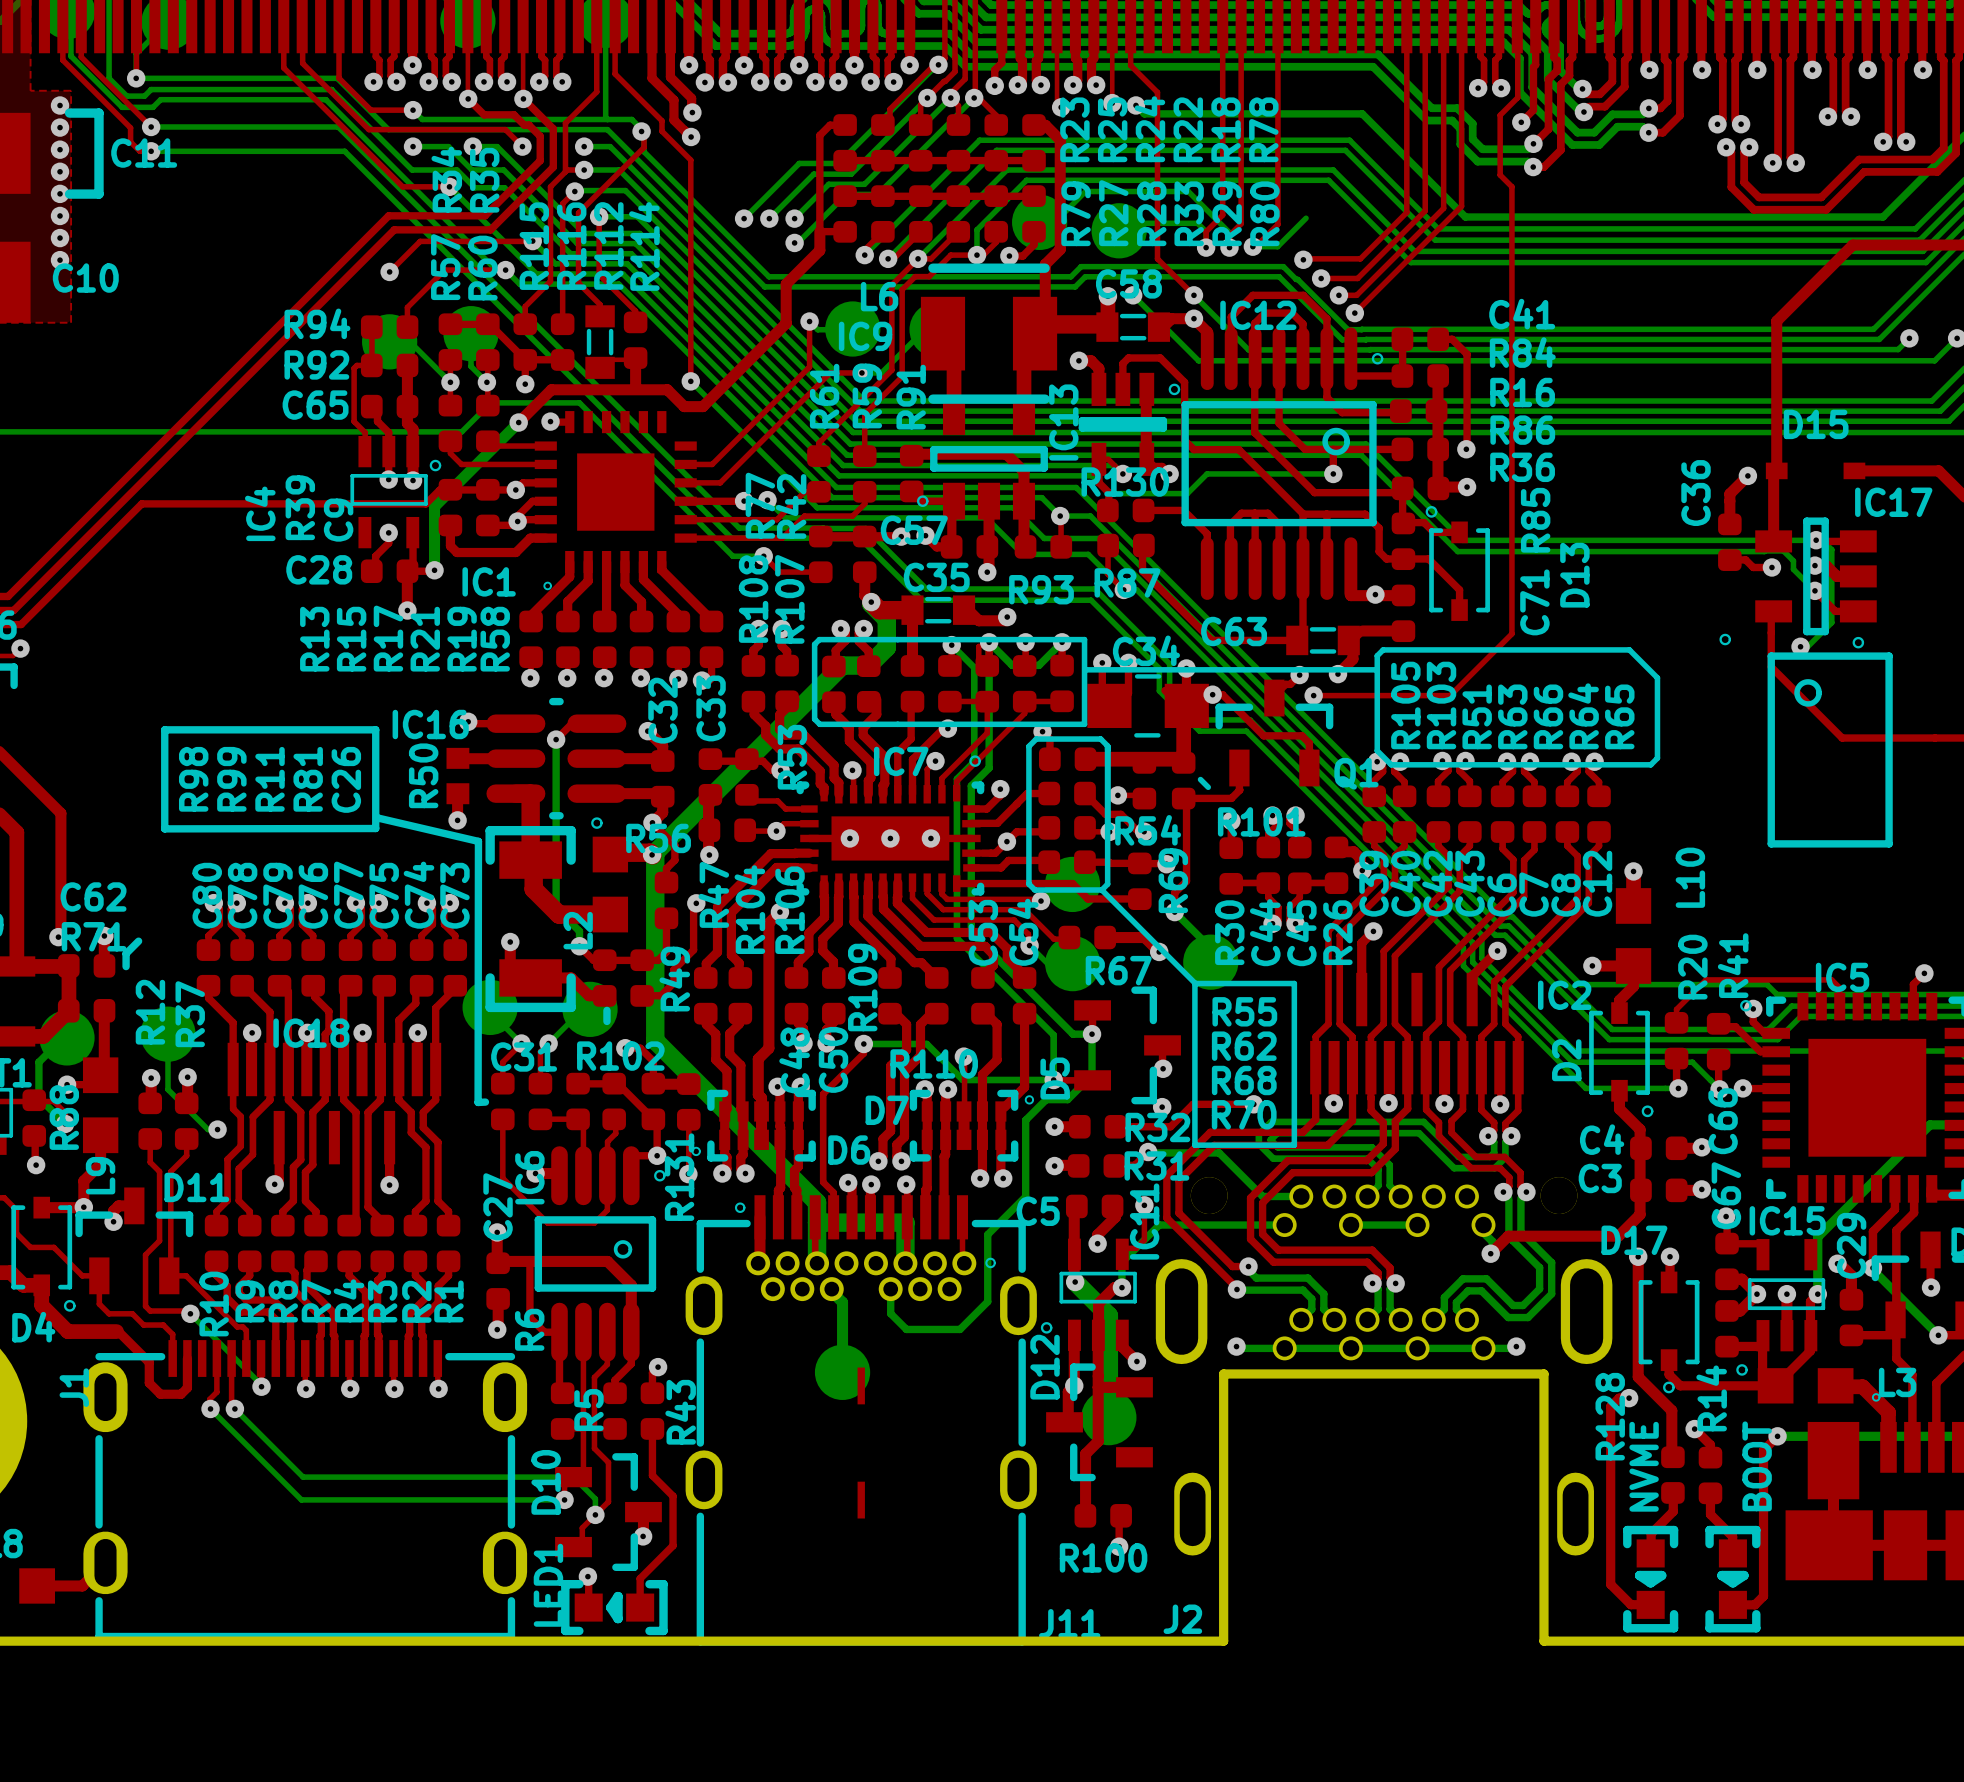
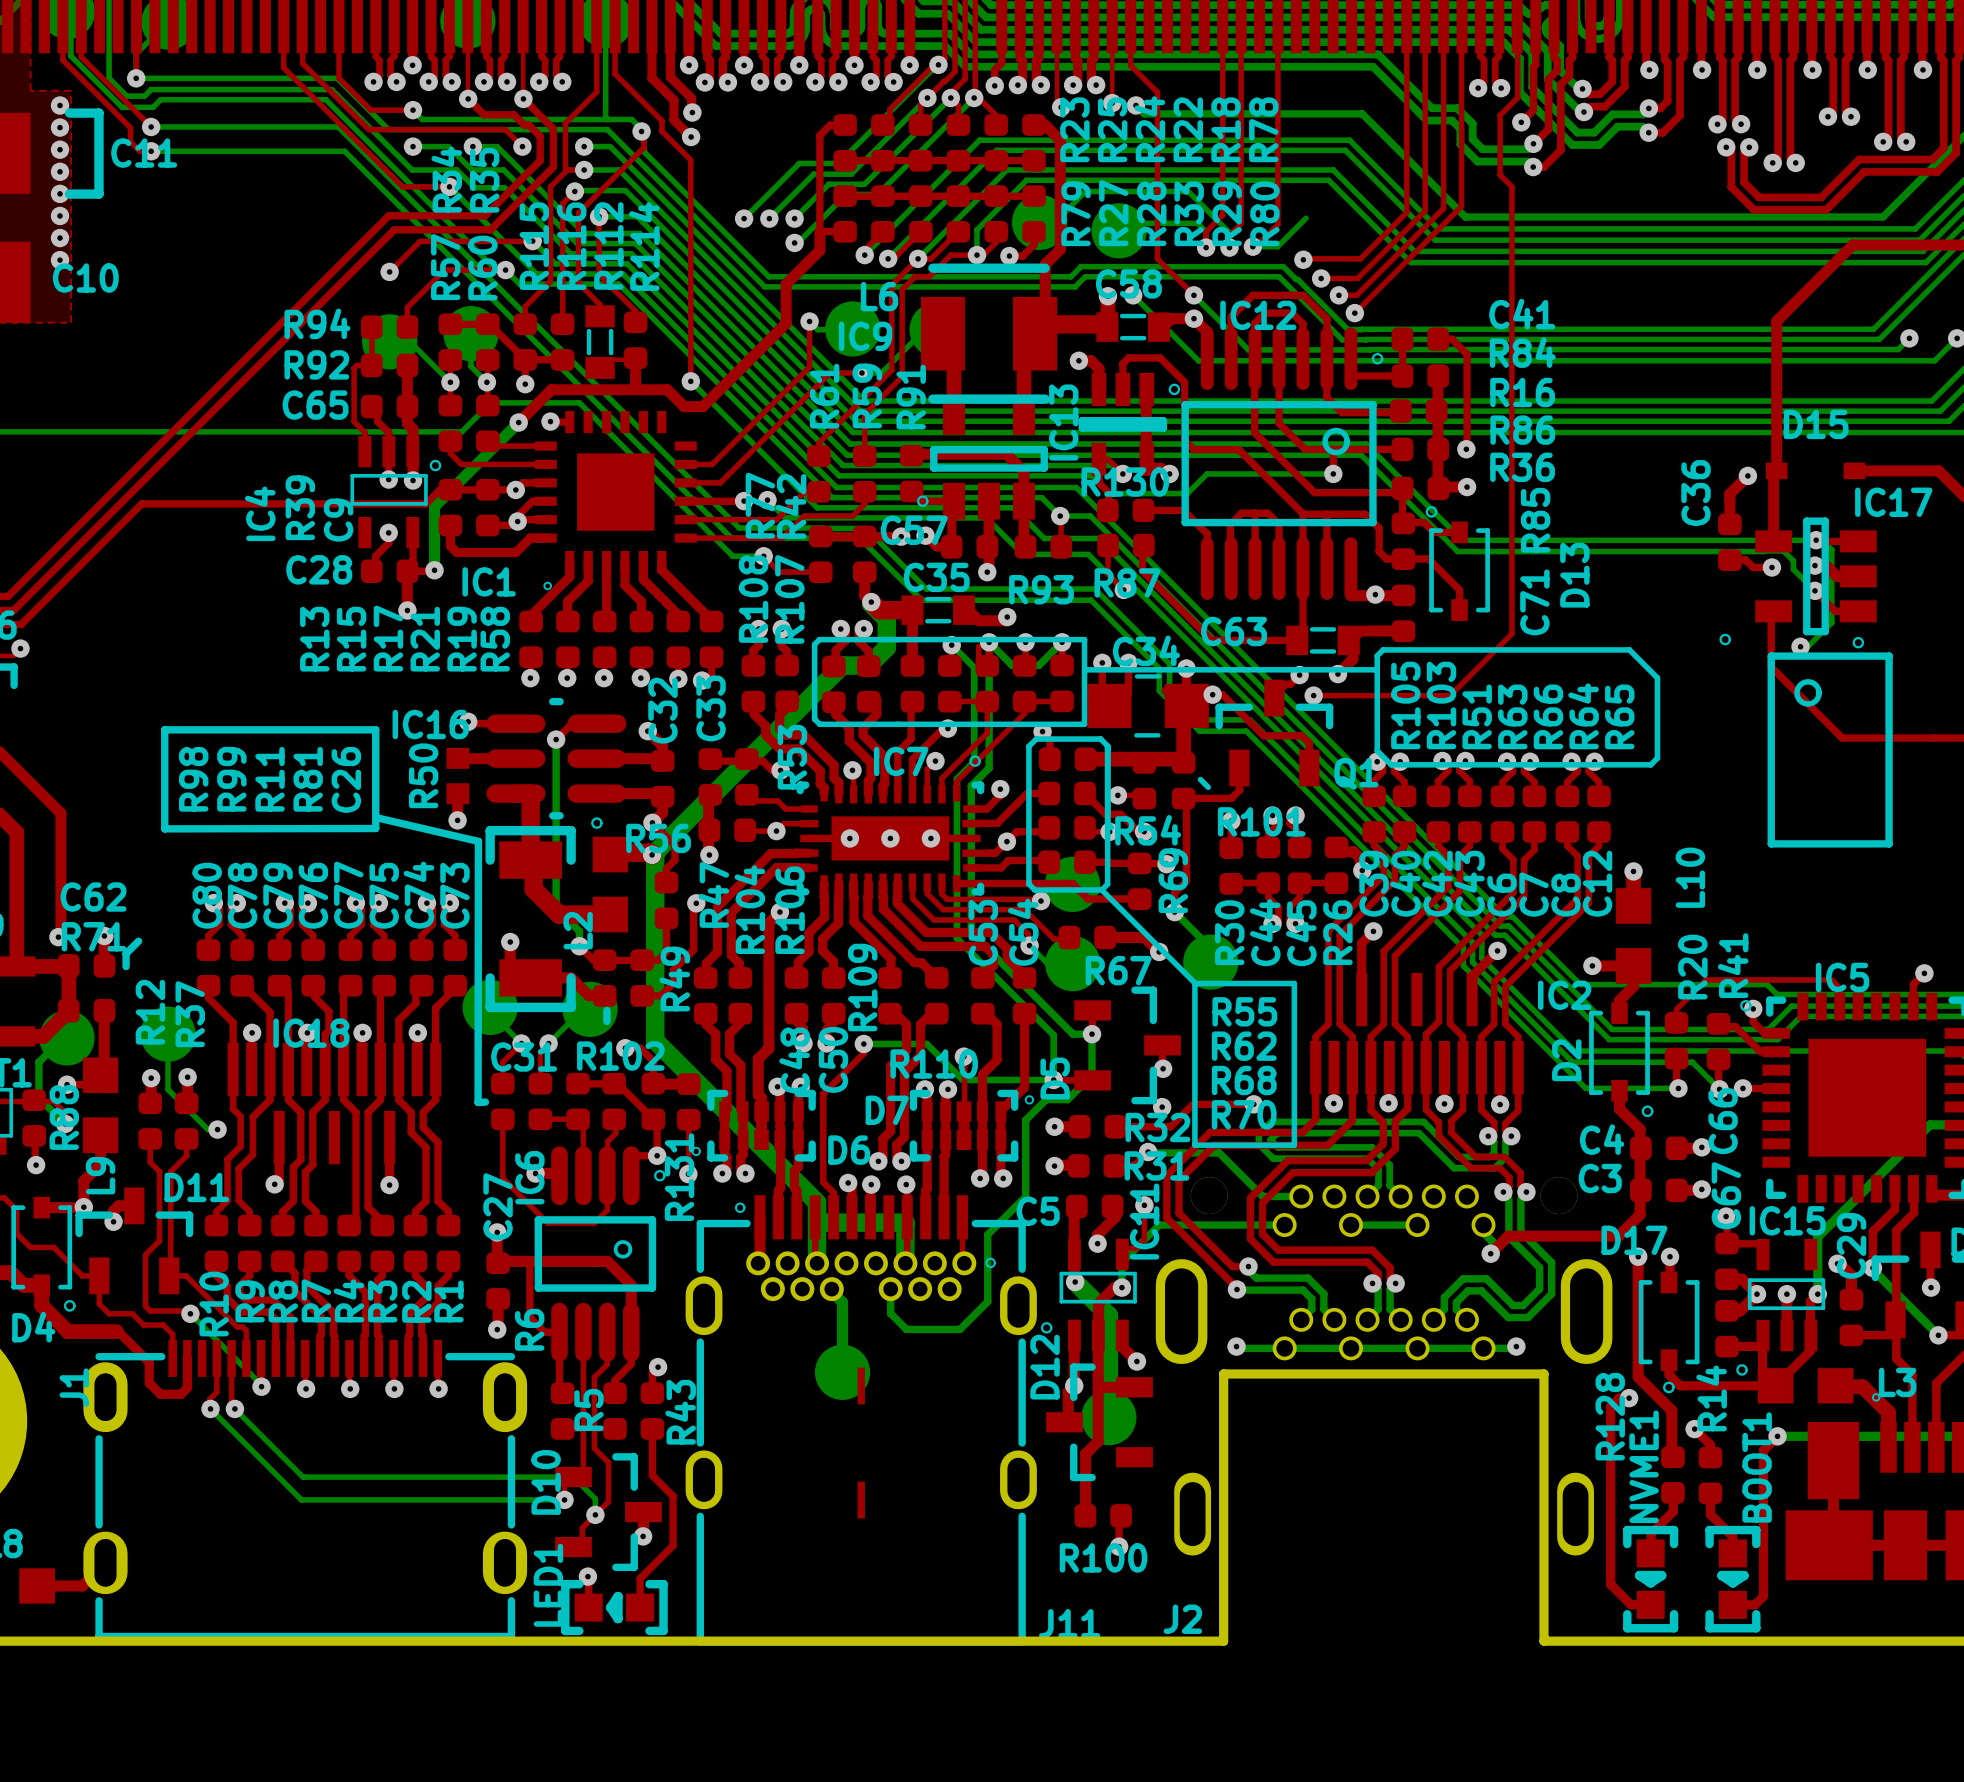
NVME name: NVME (1644, 1466) -> NVME1 (1644, 1466)
BOOT name: BOOT (1757, 1466) -> BOOT1 (1757, 1467)

